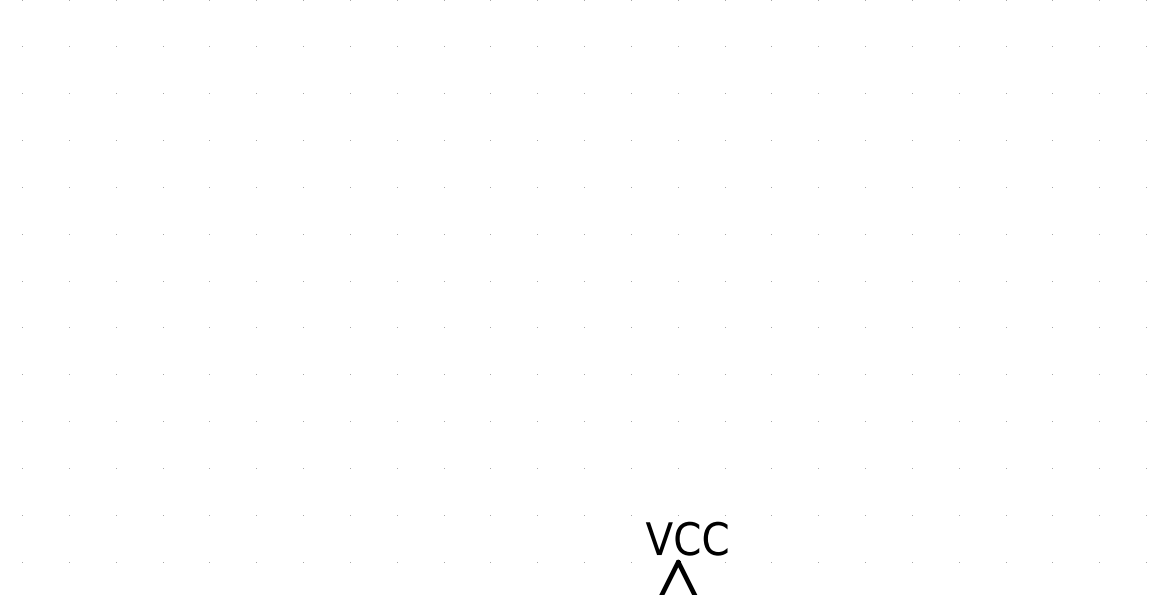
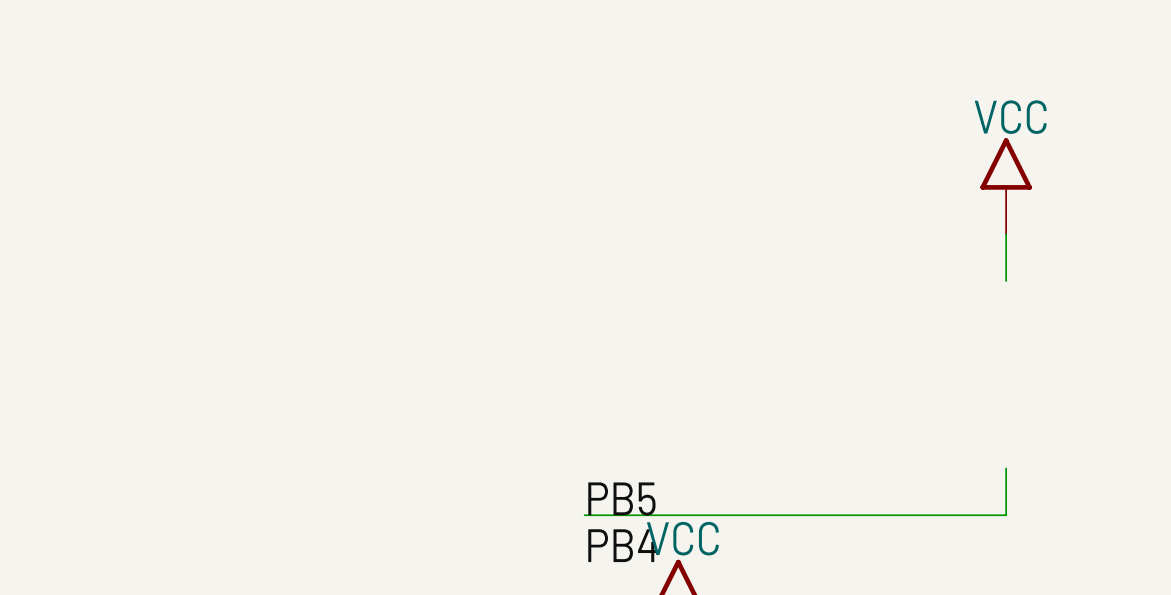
power symbol: none -> (1006, 186)
wire: none -> (1006, 234) (1006, 281)
wire: none -> (1006, 468) (1006, 515) (584, 515)
label: none -> PB5 (621, 498)
label: none -> PB4 (622, 545)

